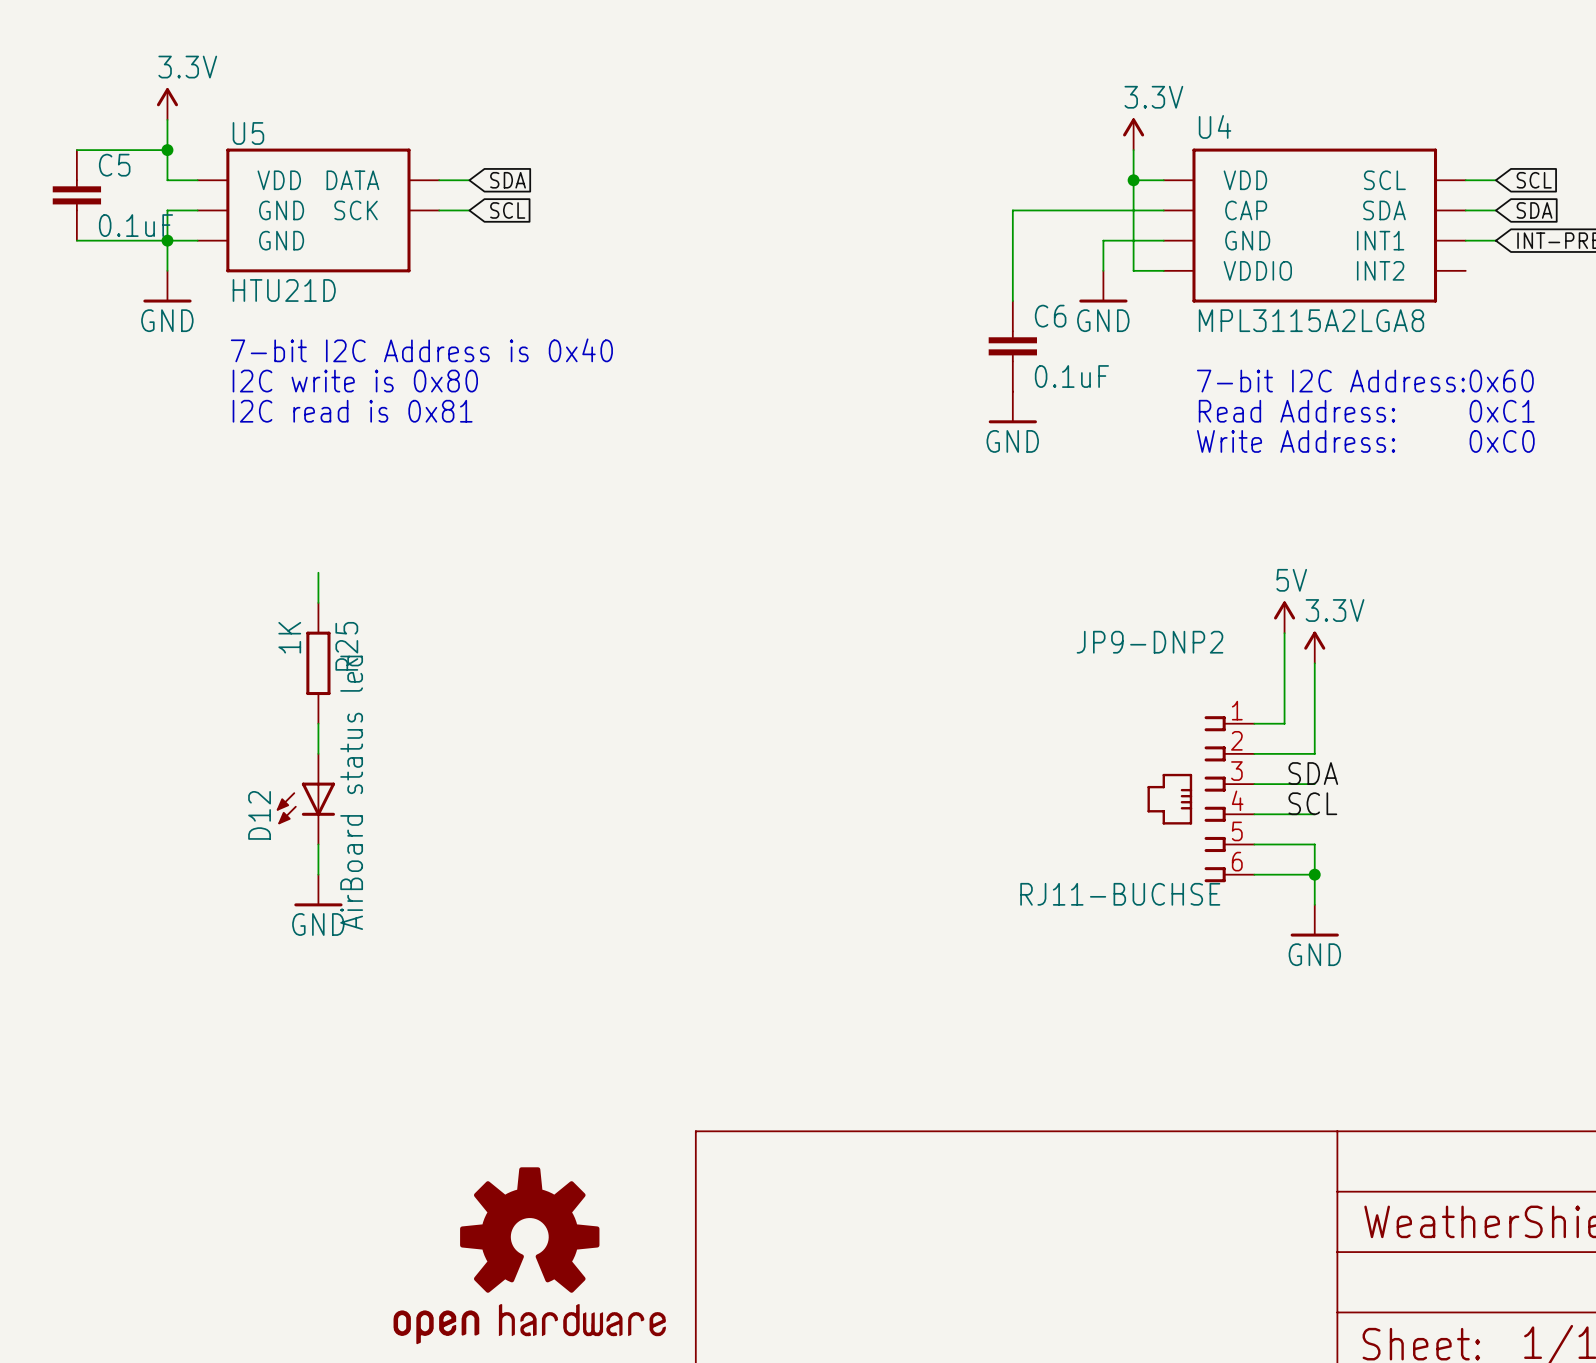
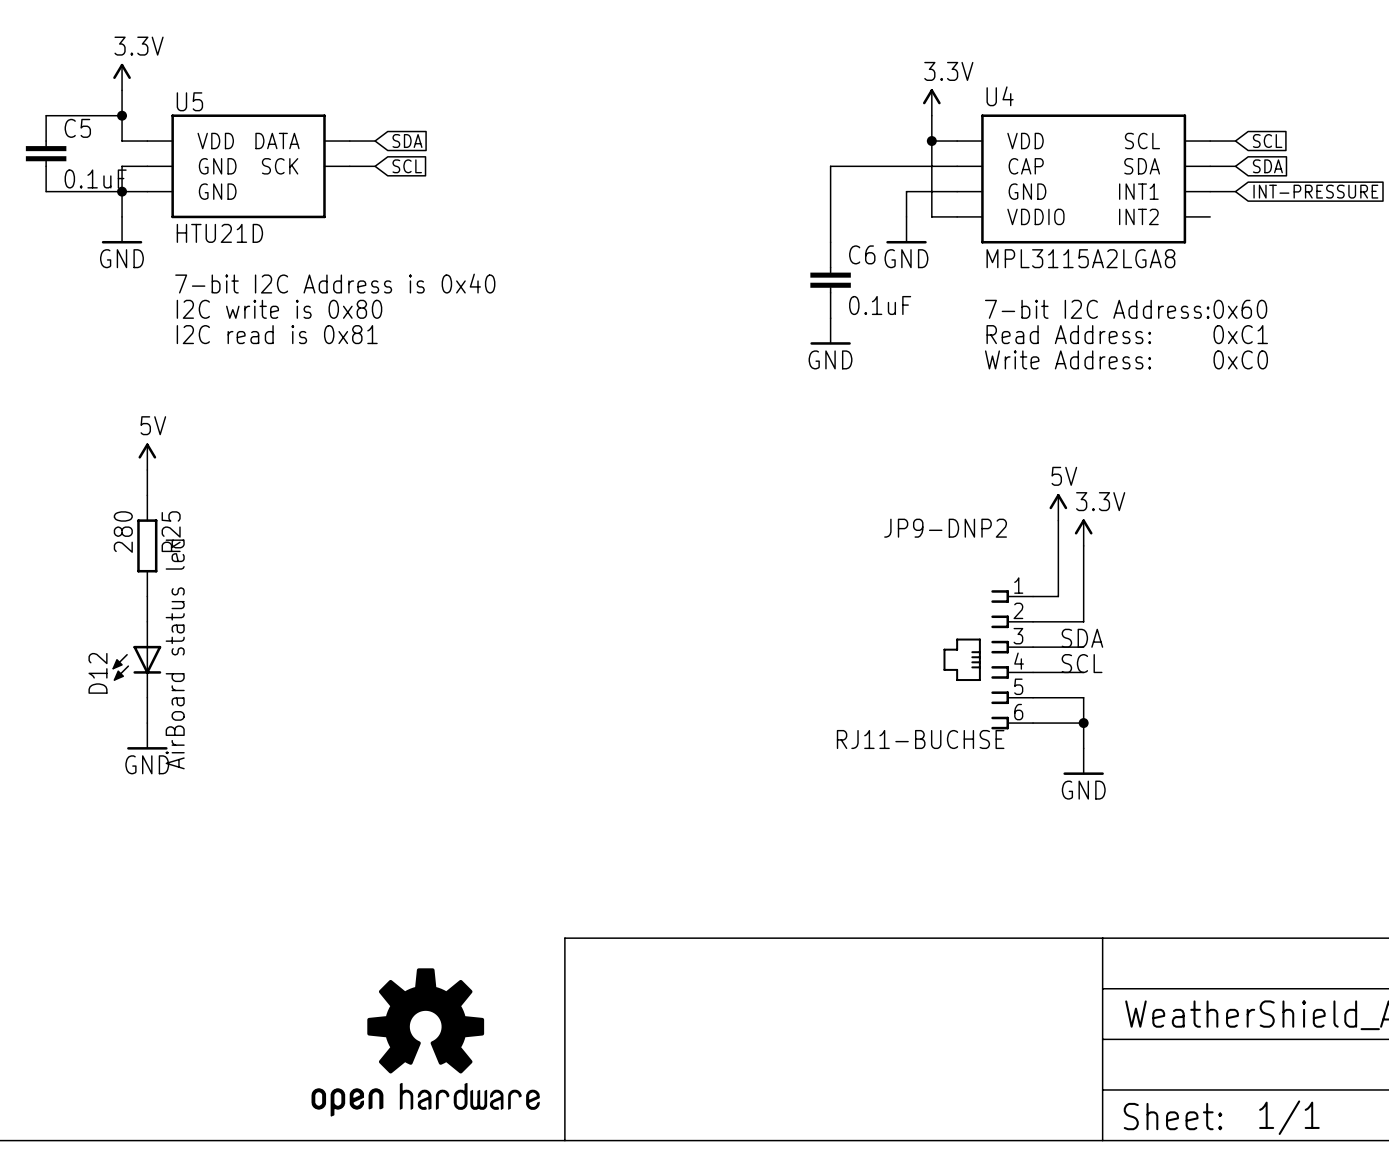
power symbol: none -> 5V (147, 456)
wire: (318, 572) (318, 602) -> (147, 469) (147, 495)
R25 value: 1K (289, 637) -> 280 (123, 532)
R25 position: (318, 663) -> (147, 545)
wire: (318, 723) (318, 753) -> (147, 596) (147, 621)
D12 position: (305, 799) -> (136, 659)
wire: (318, 844) (318, 874) -> (147, 697) (147, 723)
power symbol position: GND (318, 890) -> GND (147, 736)

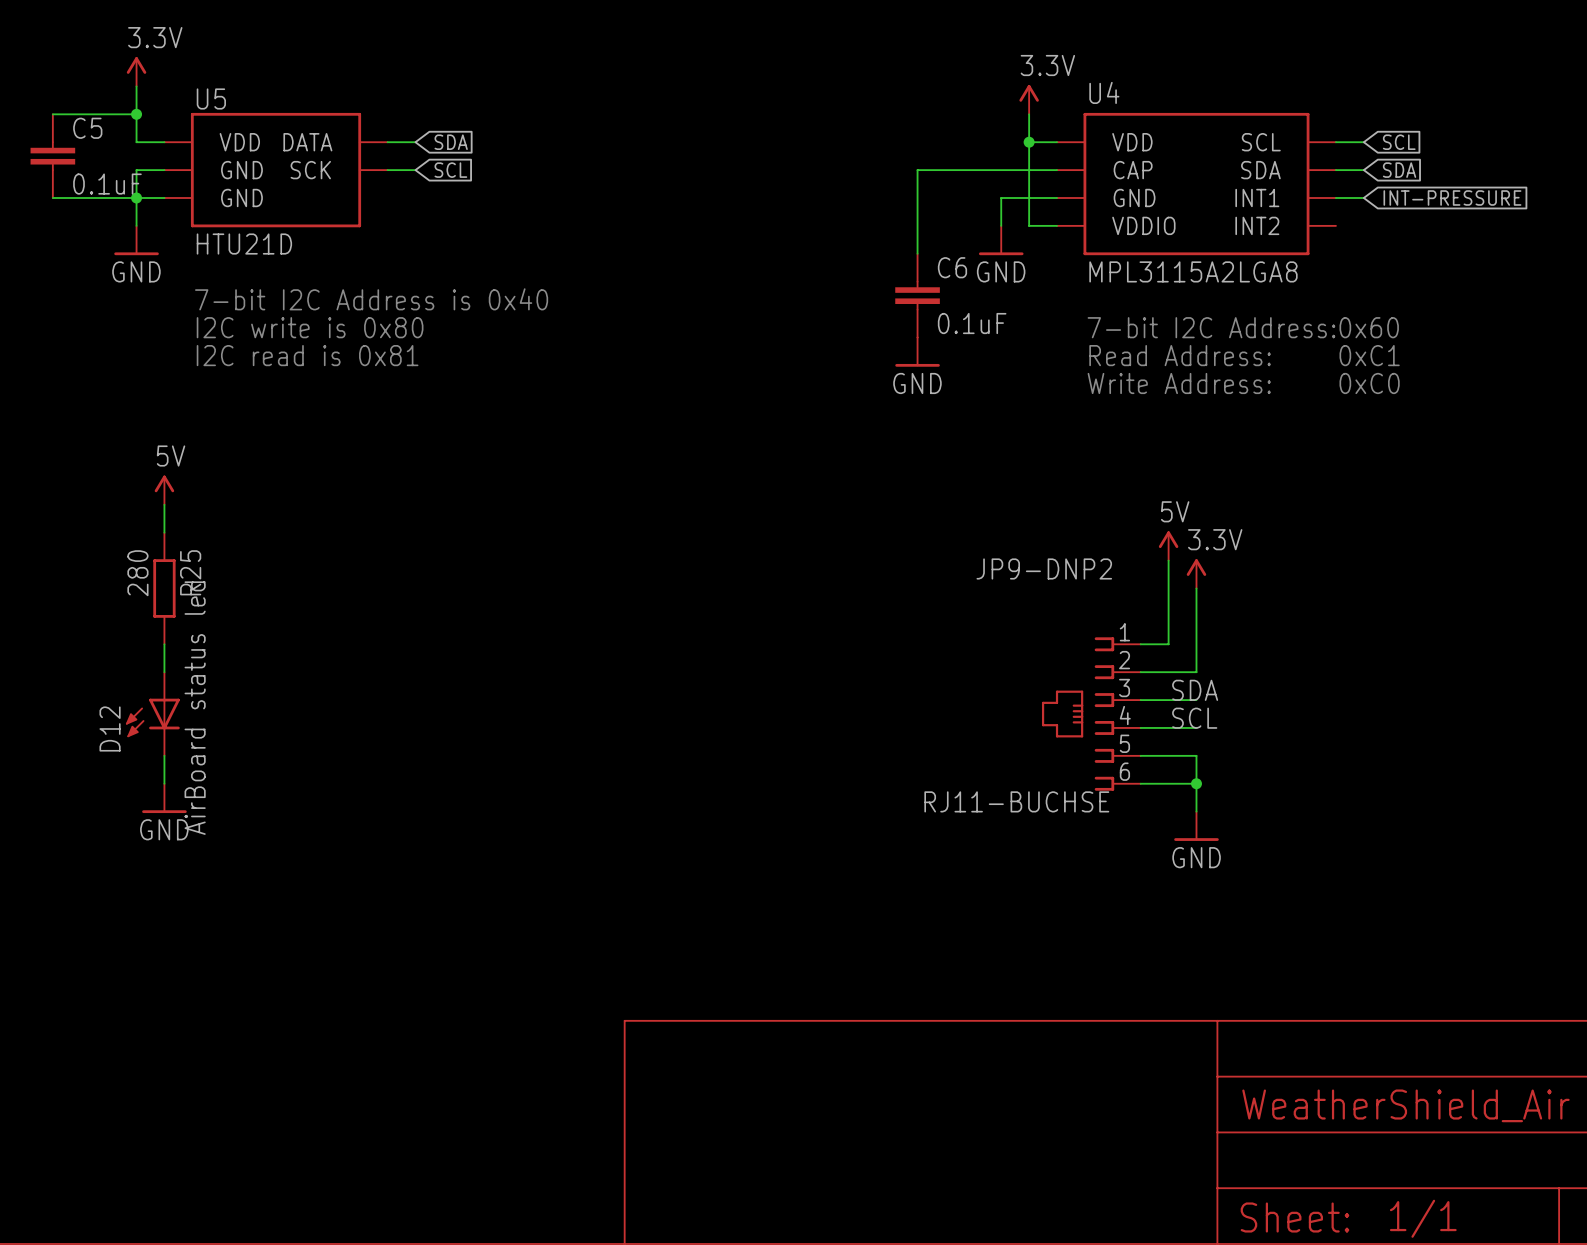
part: (425, 1042) -> none

